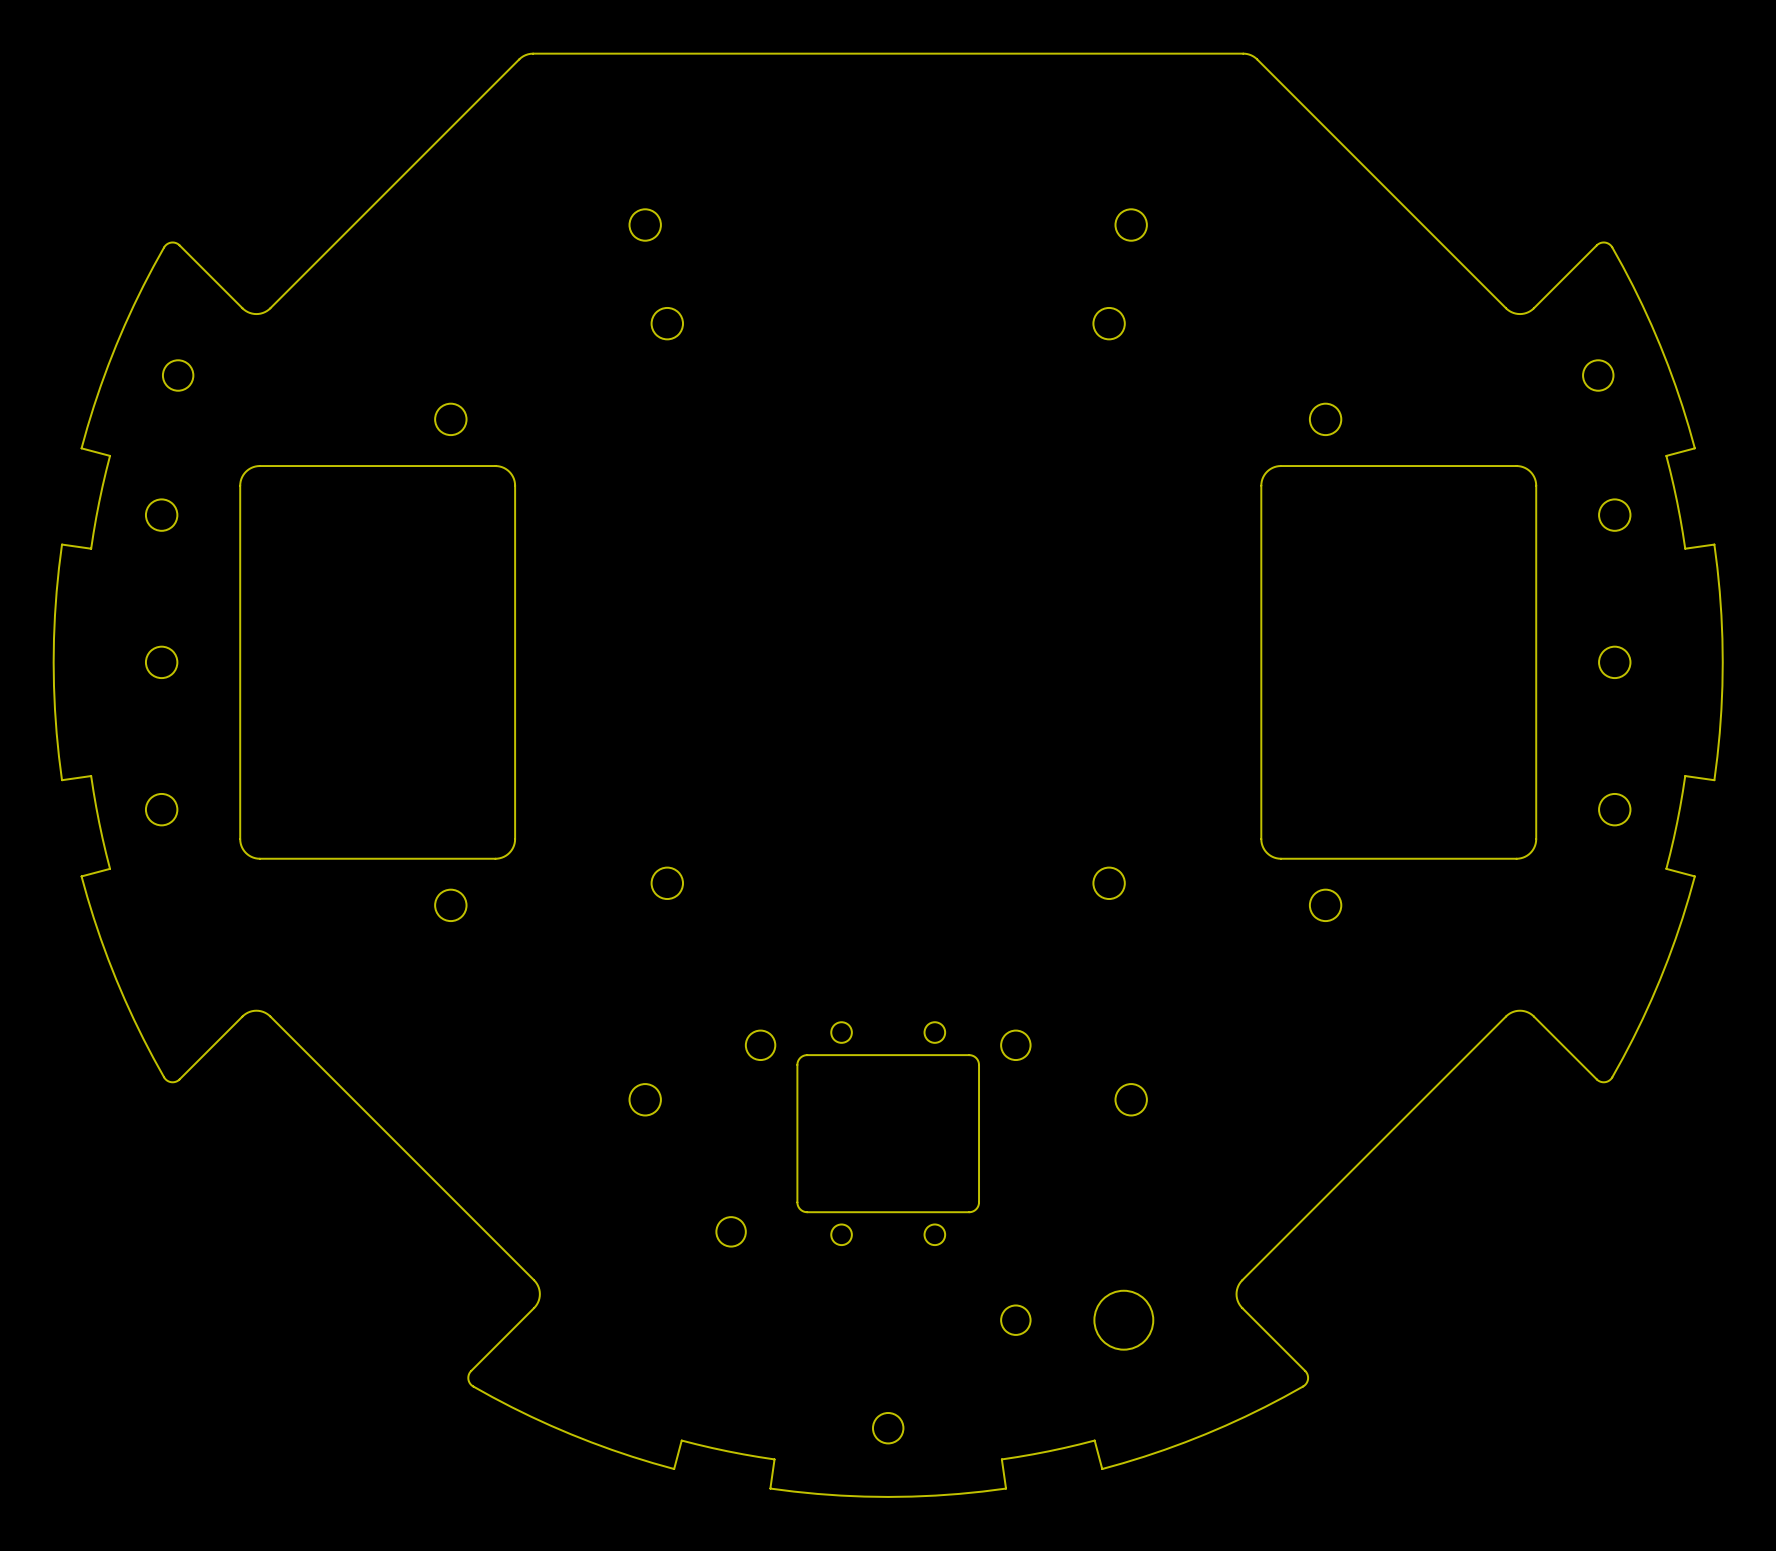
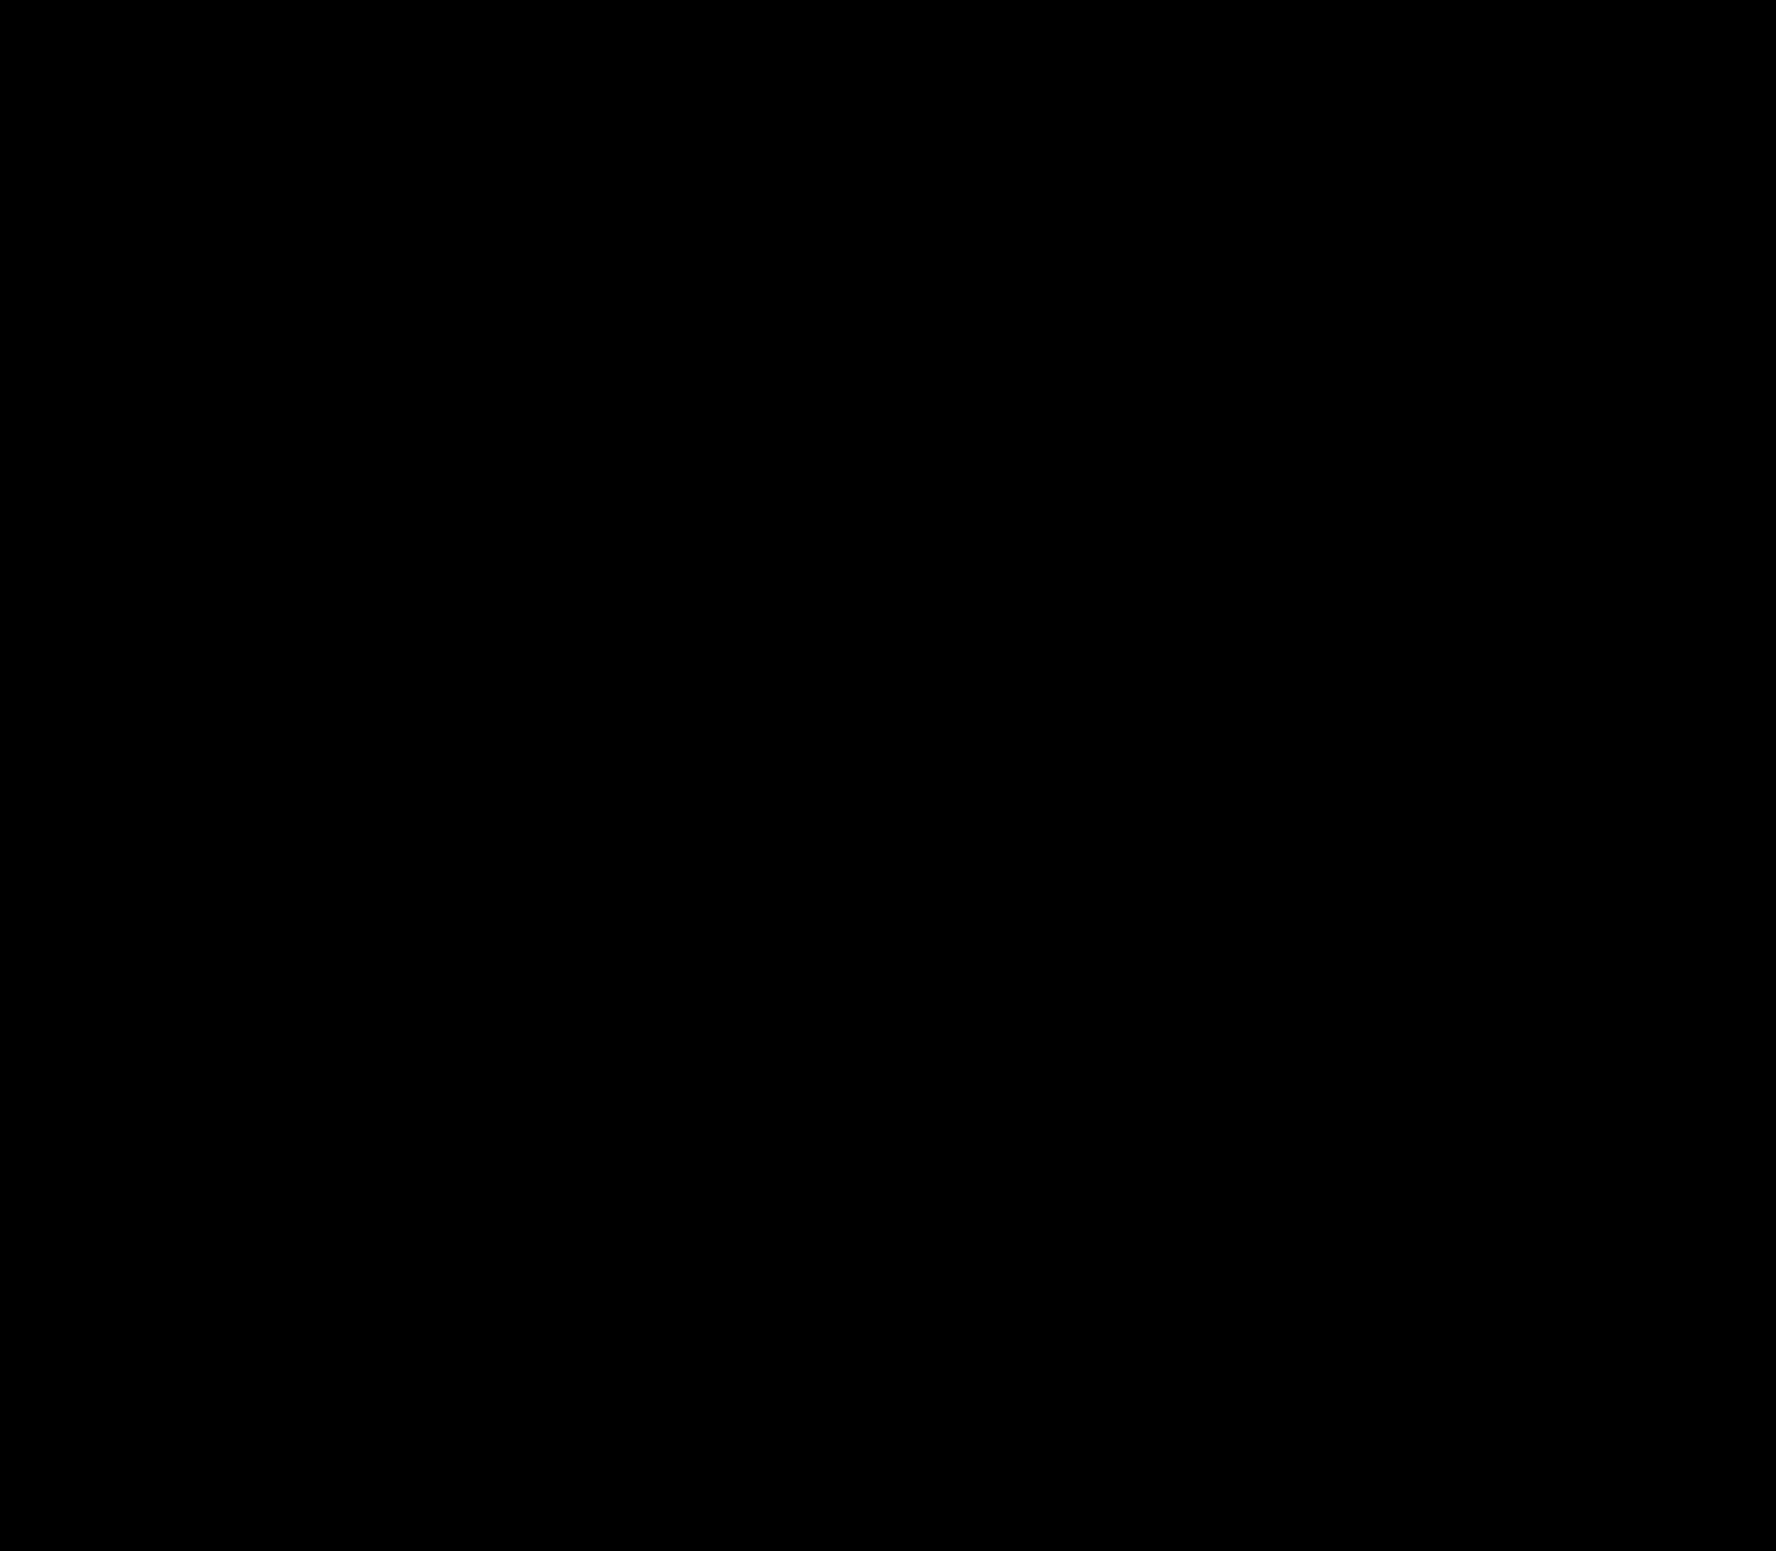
board edge: (1243, 53) (530, 53) (519, 59) (264, 312) (254, 313) (244, 309) (177, 243) (170, 242) (164, 247) (133, 305) (116, 345) (100, 385) (81, 448) (110, 455) (91, 548) (62, 544) (54, 615) (53, 662) (54, 709) (62, 780) (91, 776) (110, 868) (81, 876) (93, 918) (116, 979) (143, 1039) (166, 1079) (172, 1082) (178, 1080) (245, 1013) (254, 1010) (264, 1012) (535, 1281) (539, 1291) (536, 1304) (470, 1371) (468, 1379) (473, 1386) (531, 1416) (571, 1434) (632, 1456) (674, 1469) (681, 1440) (774, 1459) (770, 1488) (840, 1495) (888, 1496) (935, 1495) (1006, 1488) (1001, 1459) (1094, 1440) (1102, 1469) (1144, 1456) (1205, 1434) (1264, 1407) (1305, 1384) (1308, 1378) (1305, 1371) (1239, 1304) (1236, 1296) (1238, 1285) (1507, 1014) (1517, 1010) (1530, 1013) (1597, 1080) (1605, 1082) (1612, 1077) (1642, 1019) (1660, 979) (1682, 918) (1694, 876) (1666, 868) (1685, 776) (1714, 780) (1719, 733) (1722, 662) (1717, 568) (1714, 544) (1685, 548) (1666, 455) (1694, 448) (1675, 385) (1642, 305) (1610, 244) (1603, 242) (1597, 244) (1530, 311) (1519, 314) (1511, 312) (1257, 59) (1243, 53) -> none
round board edge: [628, 208, 662, 242] -> none
round board edge: [1114, 208, 1148, 242] -> none
round board edge: [650, 306, 684, 341] -> none
round board edge: [1092, 306, 1126, 341] -> none
round board edge: [161, 359, 195, 392] -> none
round board edge: [1582, 359, 1615, 392] -> none
round board edge: [434, 402, 468, 437] -> none
round board edge: [1308, 402, 1343, 437] -> none
board edge: (495, 466) (259, 466) (249, 469) (243, 475) (240, 485) (240, 839) (242, 847) (249, 855) (259, 858) (495, 858) (504, 856) (512, 849) (515, 839) (515, 485) (509, 471) (495, 466) -> none
board edge: (1516, 466) (1280, 466) (1270, 469) (1264, 475) (1261, 485) (1261, 839) (1264, 849) (1270, 855) (1280, 858) (1516, 858) (1525, 856) (1533, 849) (1536, 839) (1536, 485) (1530, 471) (1516, 466) -> none
round board edge: [144, 498, 179, 532] -> none
round board edge: [1598, 498, 1632, 532] -> none
round board edge: [144, 645, 179, 680] -> none
round board edge: [1598, 645, 1632, 680] -> none
round board edge: [144, 792, 179, 827] -> none
round board edge: [1598, 792, 1632, 827] -> none
round board edge: [650, 866, 684, 900] -> none
round board edge: [1092, 866, 1126, 900] -> none
round board edge: [434, 888, 468, 923] -> none
round board edge: [1308, 888, 1343, 923] -> none
round board edge: [830, 1021, 853, 1044] -> none
round board edge: [923, 1021, 947, 1044] -> none
round board edge: [744, 1029, 777, 1062] -> none
round board edge: [1000, 1029, 1032, 1062] -> none
board edge: (969, 1055) (807, 1055) (800, 1057) (797, 1064) (797, 1202) (800, 1209) (807, 1212) (969, 1212) (976, 1209) (979, 1202) (979, 1064) (976, 1057) (969, 1055) -> none
round board edge: [628, 1083, 662, 1117] -> none
round board edge: [1114, 1083, 1148, 1117] -> none
round board edge: [715, 1216, 747, 1248] -> none
round board edge: [830, 1223, 853, 1247] -> none
round board edge: [923, 1223, 947, 1247] -> none
round board edge: [1093, 1289, 1155, 1351] -> none
round board edge: [1000, 1304, 1032, 1336] -> none
round board edge: [872, 1412, 905, 1445] -> none

